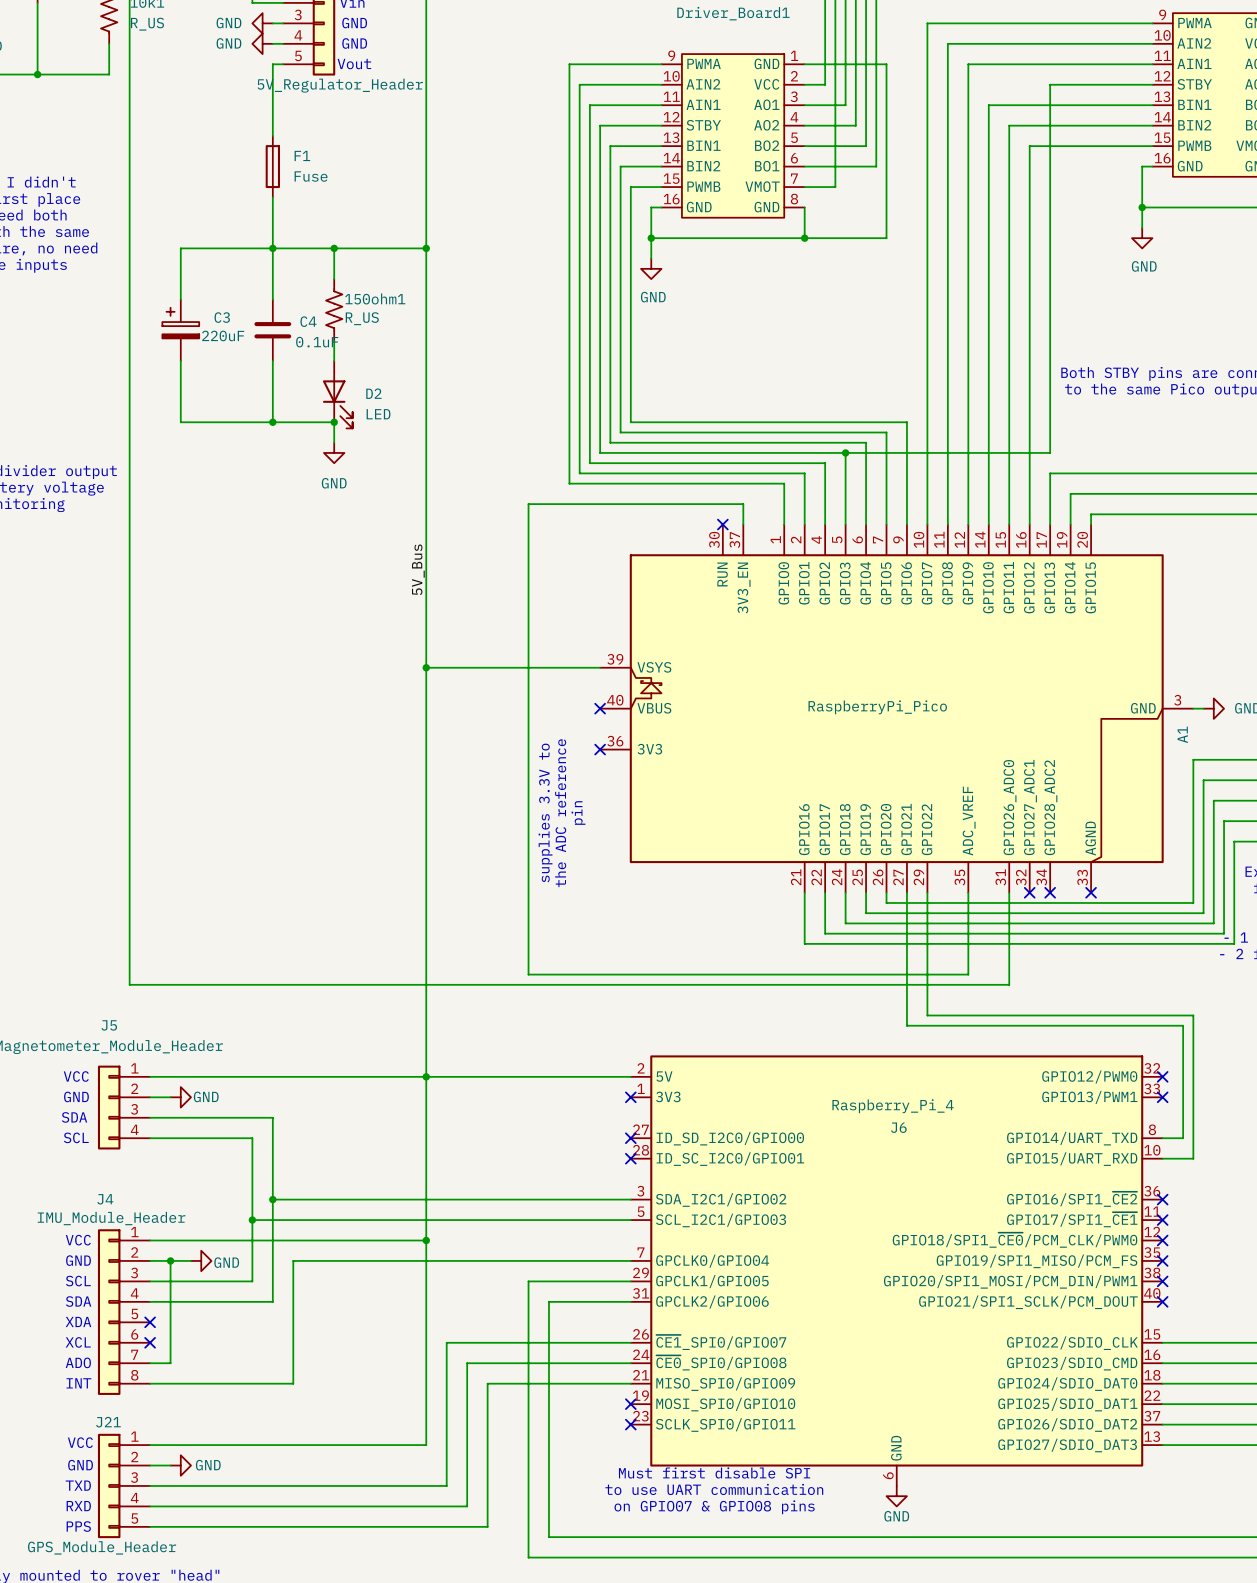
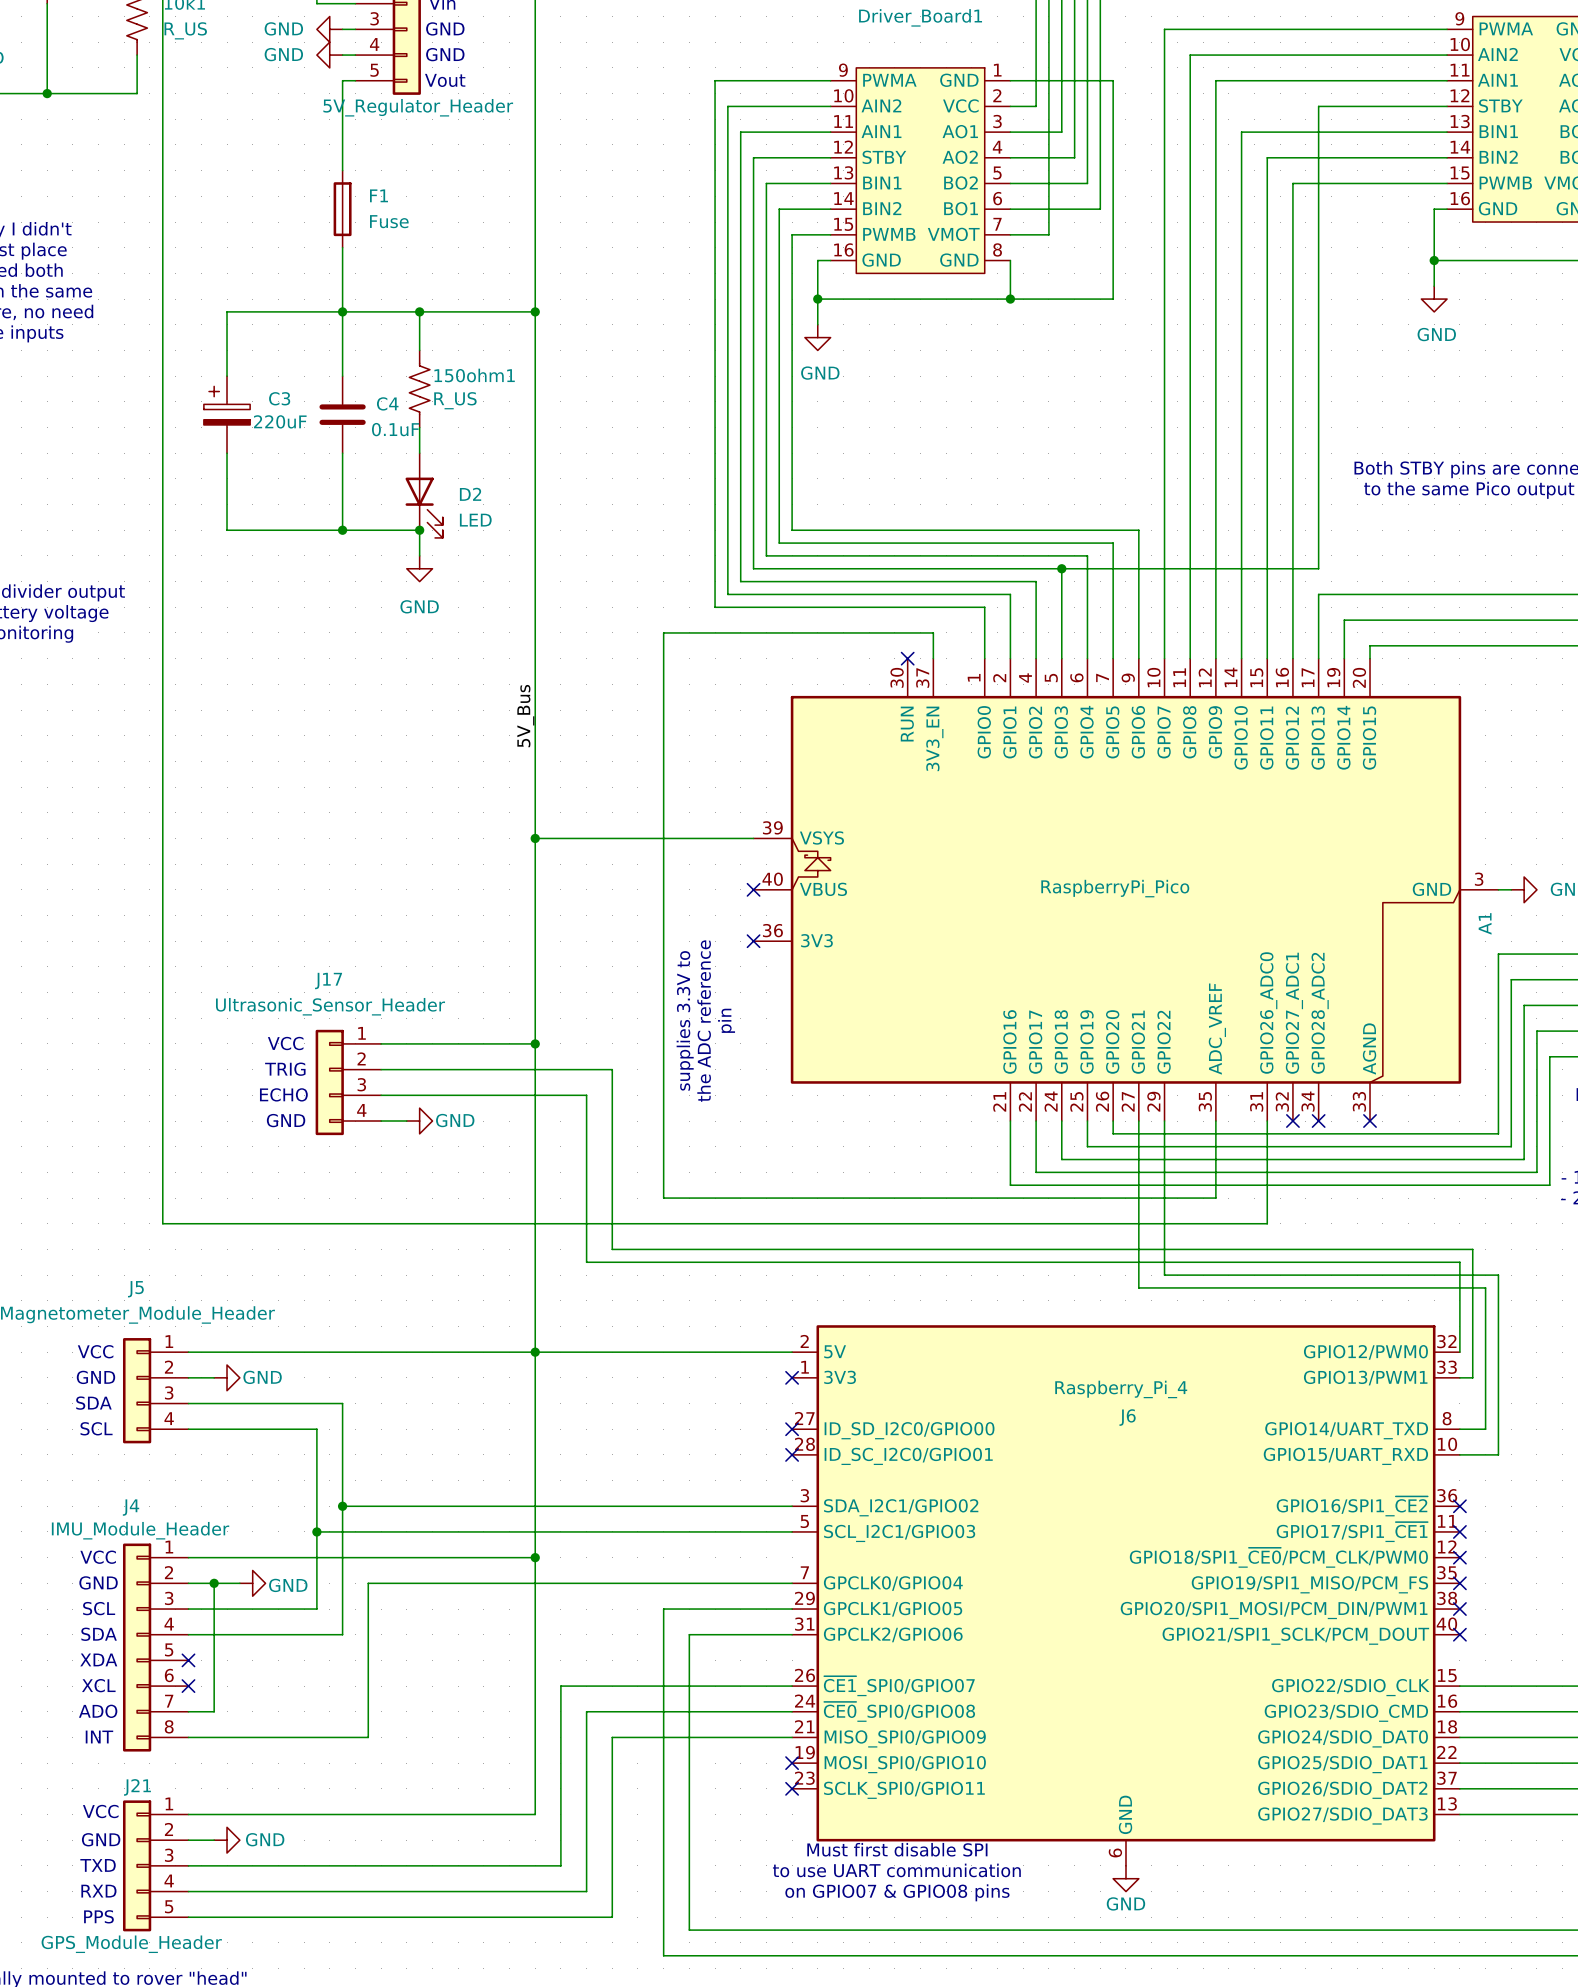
text: none -> VCC (285, 1043)
wire: none -> (381, 1043) (535, 1043)
junction: none -> (535, 1043)
text: none -> TRIG (285, 1069)
wire: none -> (381, 1069) (612, 1069) (612, 1249) (1472, 1249) (1472, 1377) (1459, 1377)
J17: none -> Ultrasonic_Sensor_Header (348, 1082)
text: none -> ECHO (283, 1094)
wire: none -> (381, 1095) (586, 1095) (586, 1262) (1459, 1262) (1459, 1352)
text: none -> GND (286, 1120)
wire: none -> (381, 1121) (406, 1121)
power symbol: none -> GND (419, 1121)
wire: (528, 954) (528, 974) -> (162, 1223) (663, 1223)
wire: none -> (663, 1198) (1215, 1198)
wire: (968, 954) (968, 974) -> (1267, 1223) (1215, 1223)
wire: (129, 974) (129, 984) (1009, 984) (1009, 974) -> none
no-connect mark: (1162, 1076) -> none
no-connect mark: (1162, 1097) -> none

